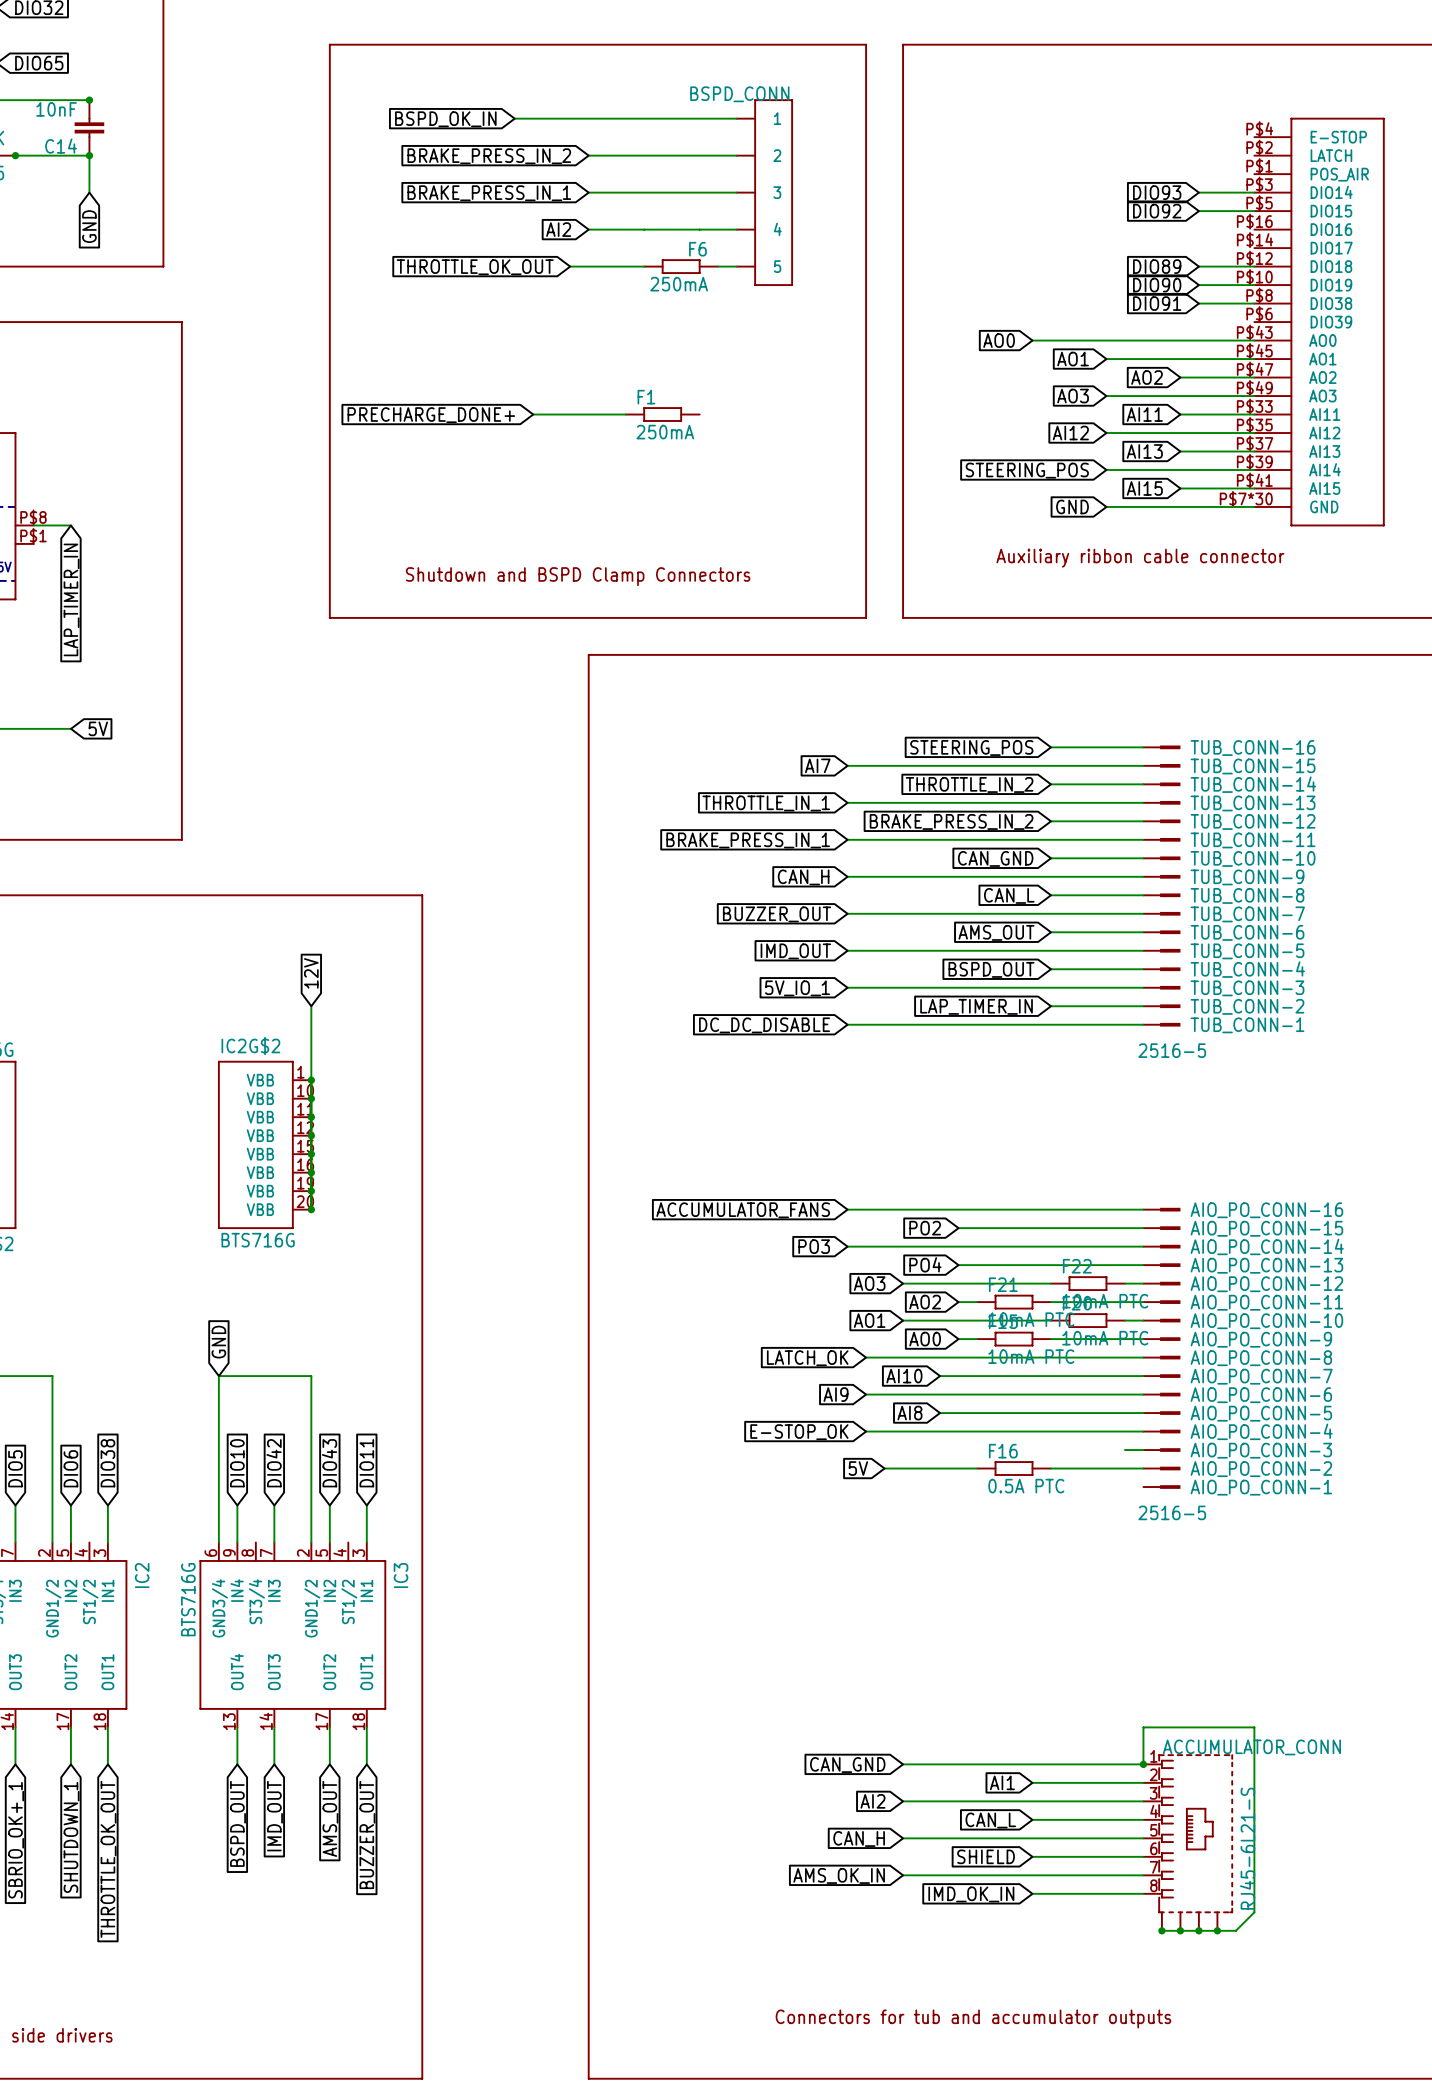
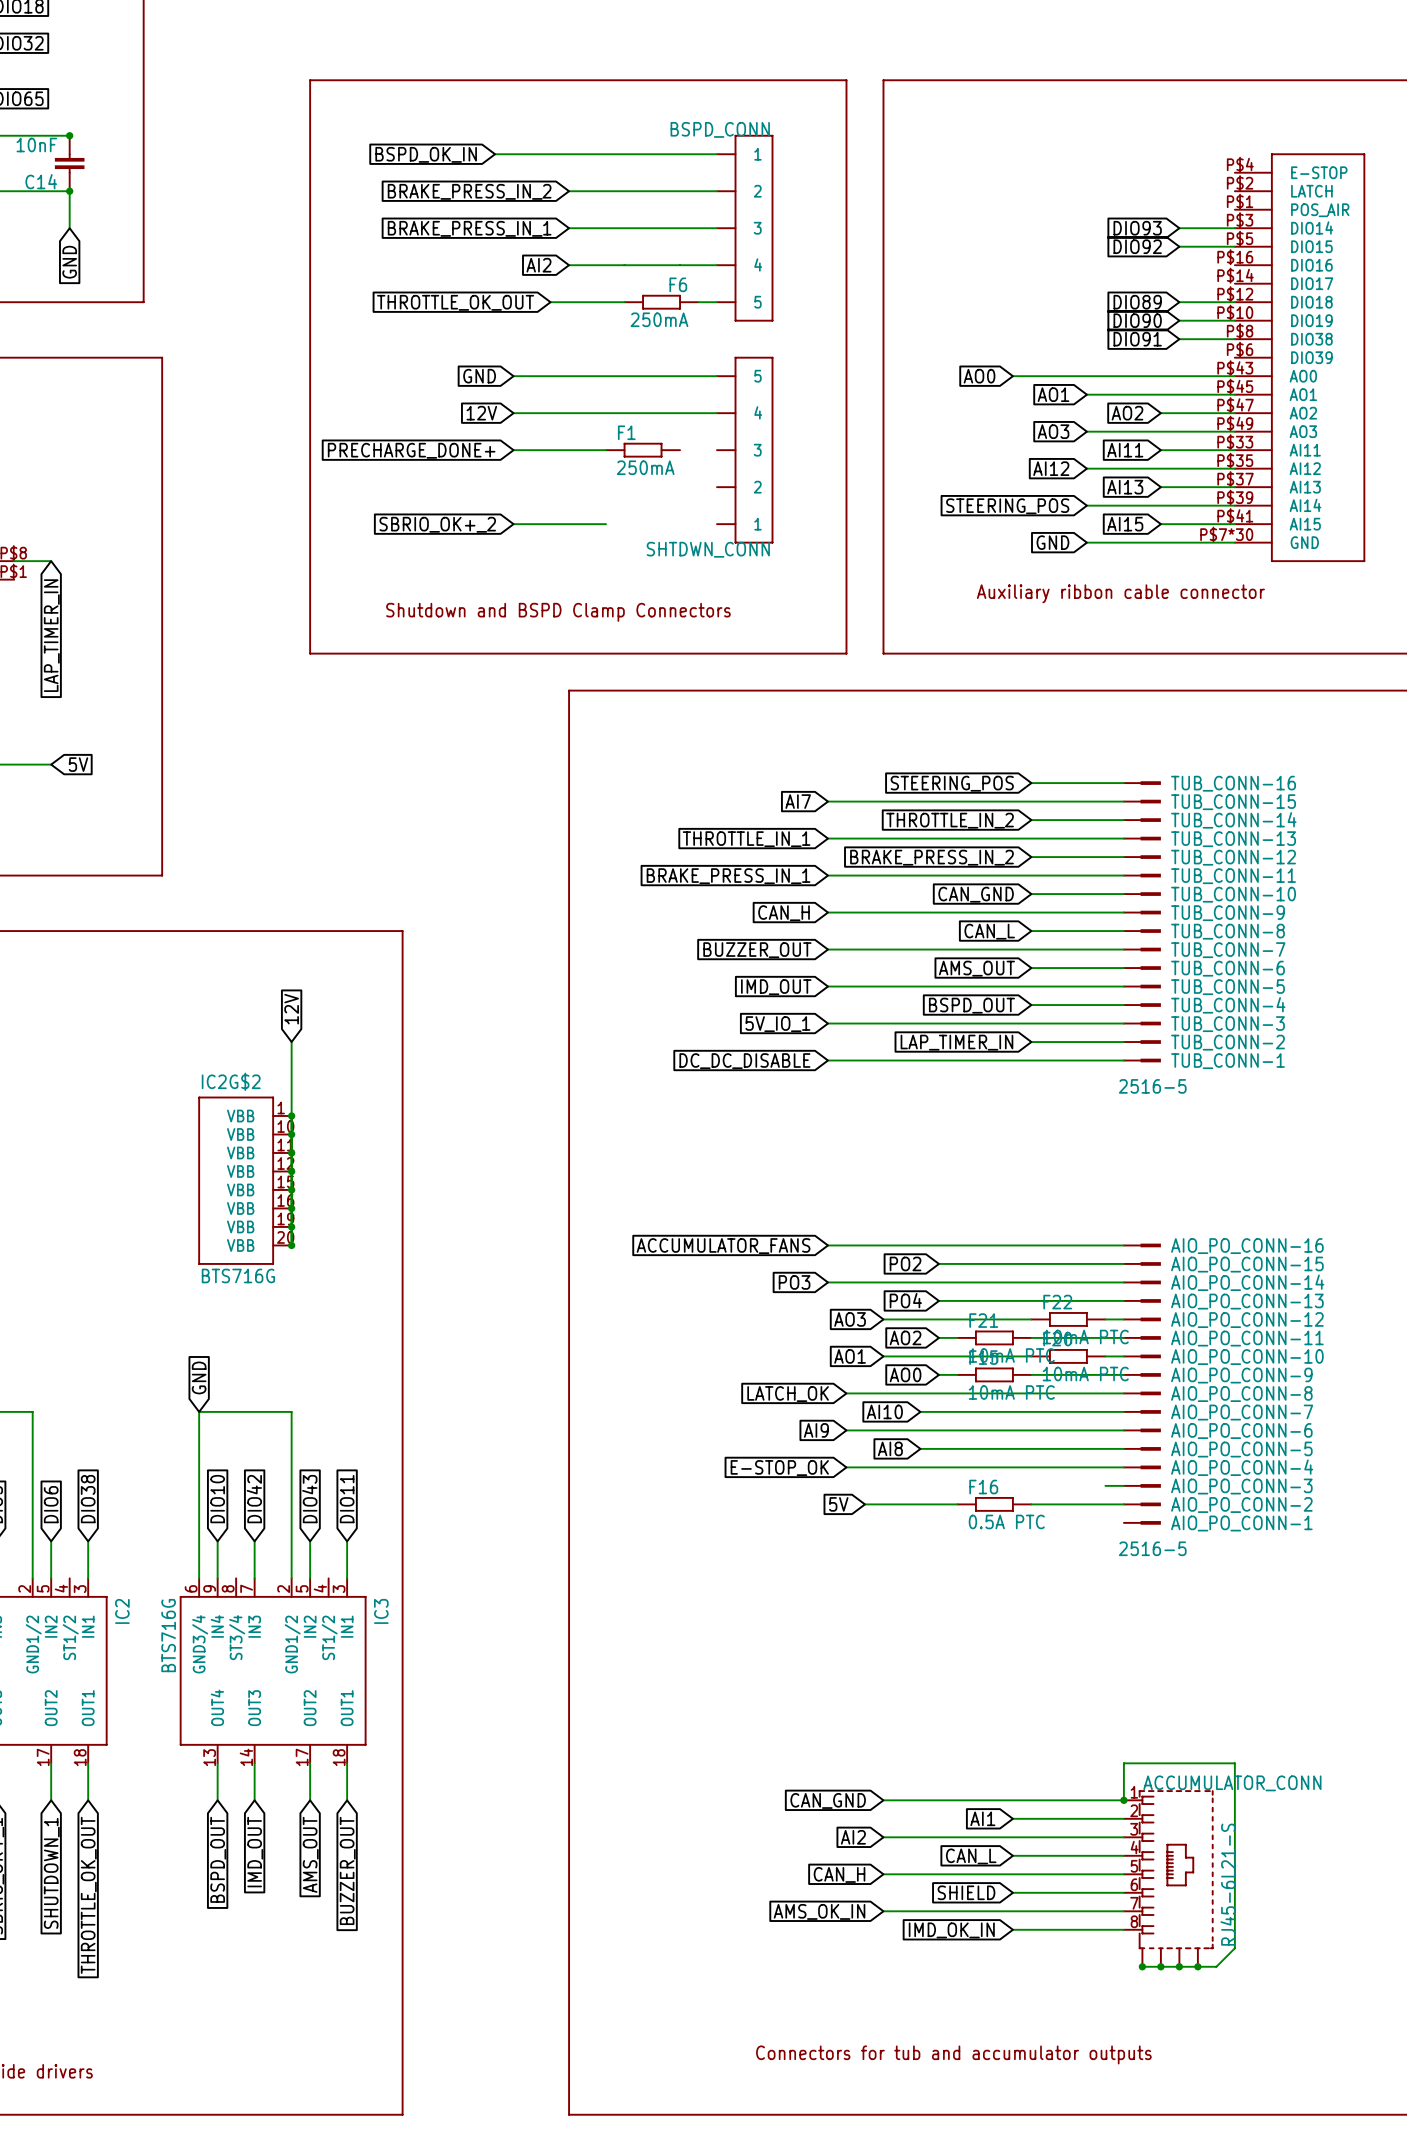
global label: none -> GND (479, 376)
wire: none -> (513, 376) (717, 376)
global label: none -> 12V (481, 413)
wire: none -> (513, 413) (717, 413)
SHTDWN_CONN: none -> (745, 450)
wire: none -> (513, 524) (606, 524)
global label: none -> SBRIO_OK+_2 (437, 524)

